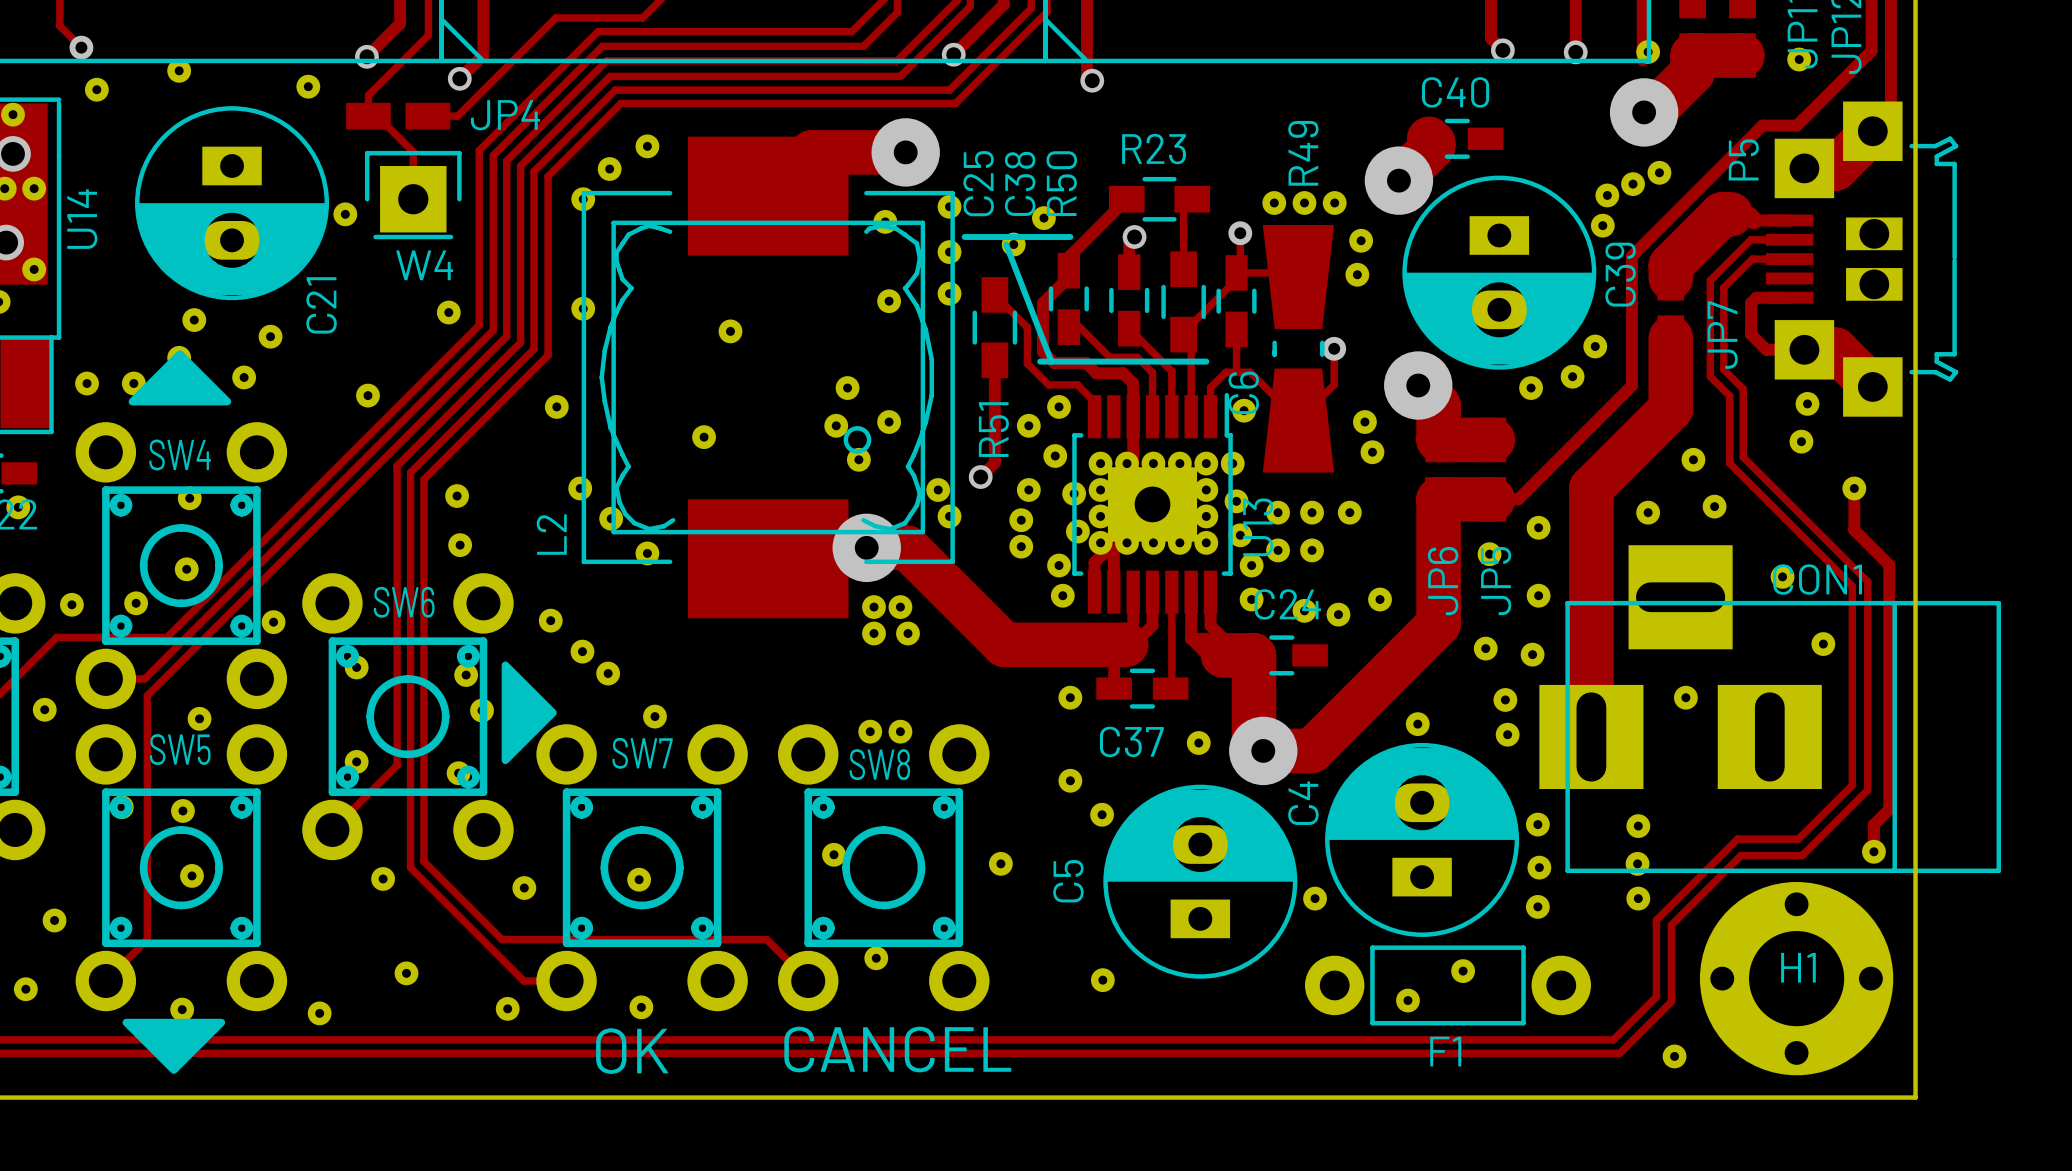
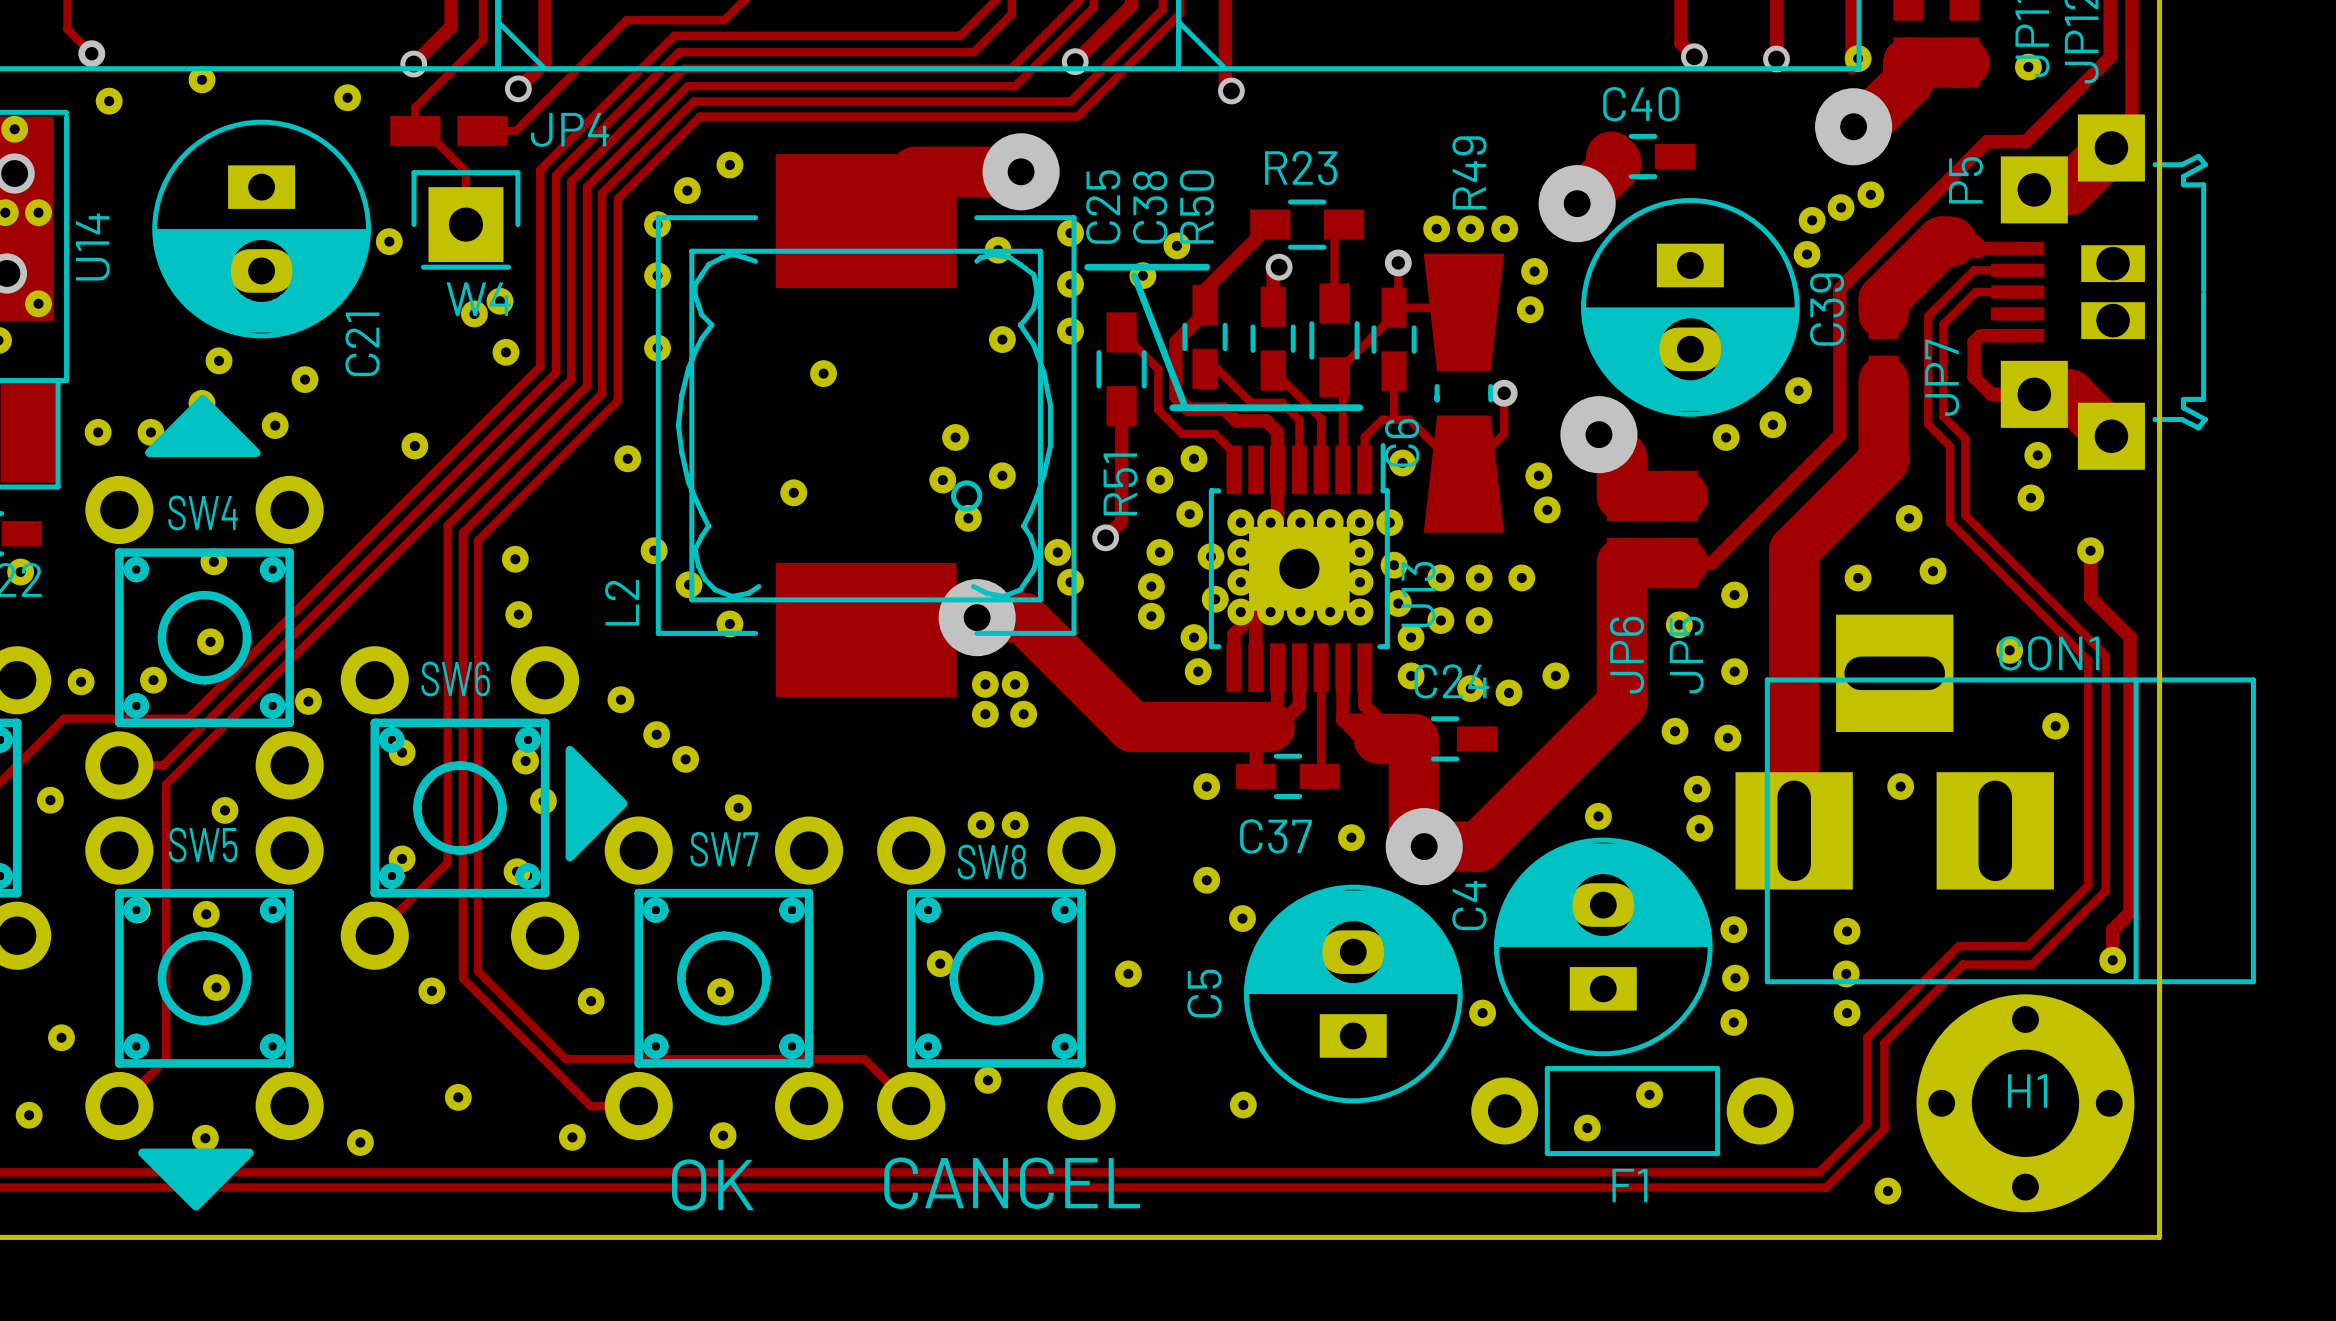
part: none -> (657, 275)
part: none -> (500, 301)
part: none -> (474, 314)

